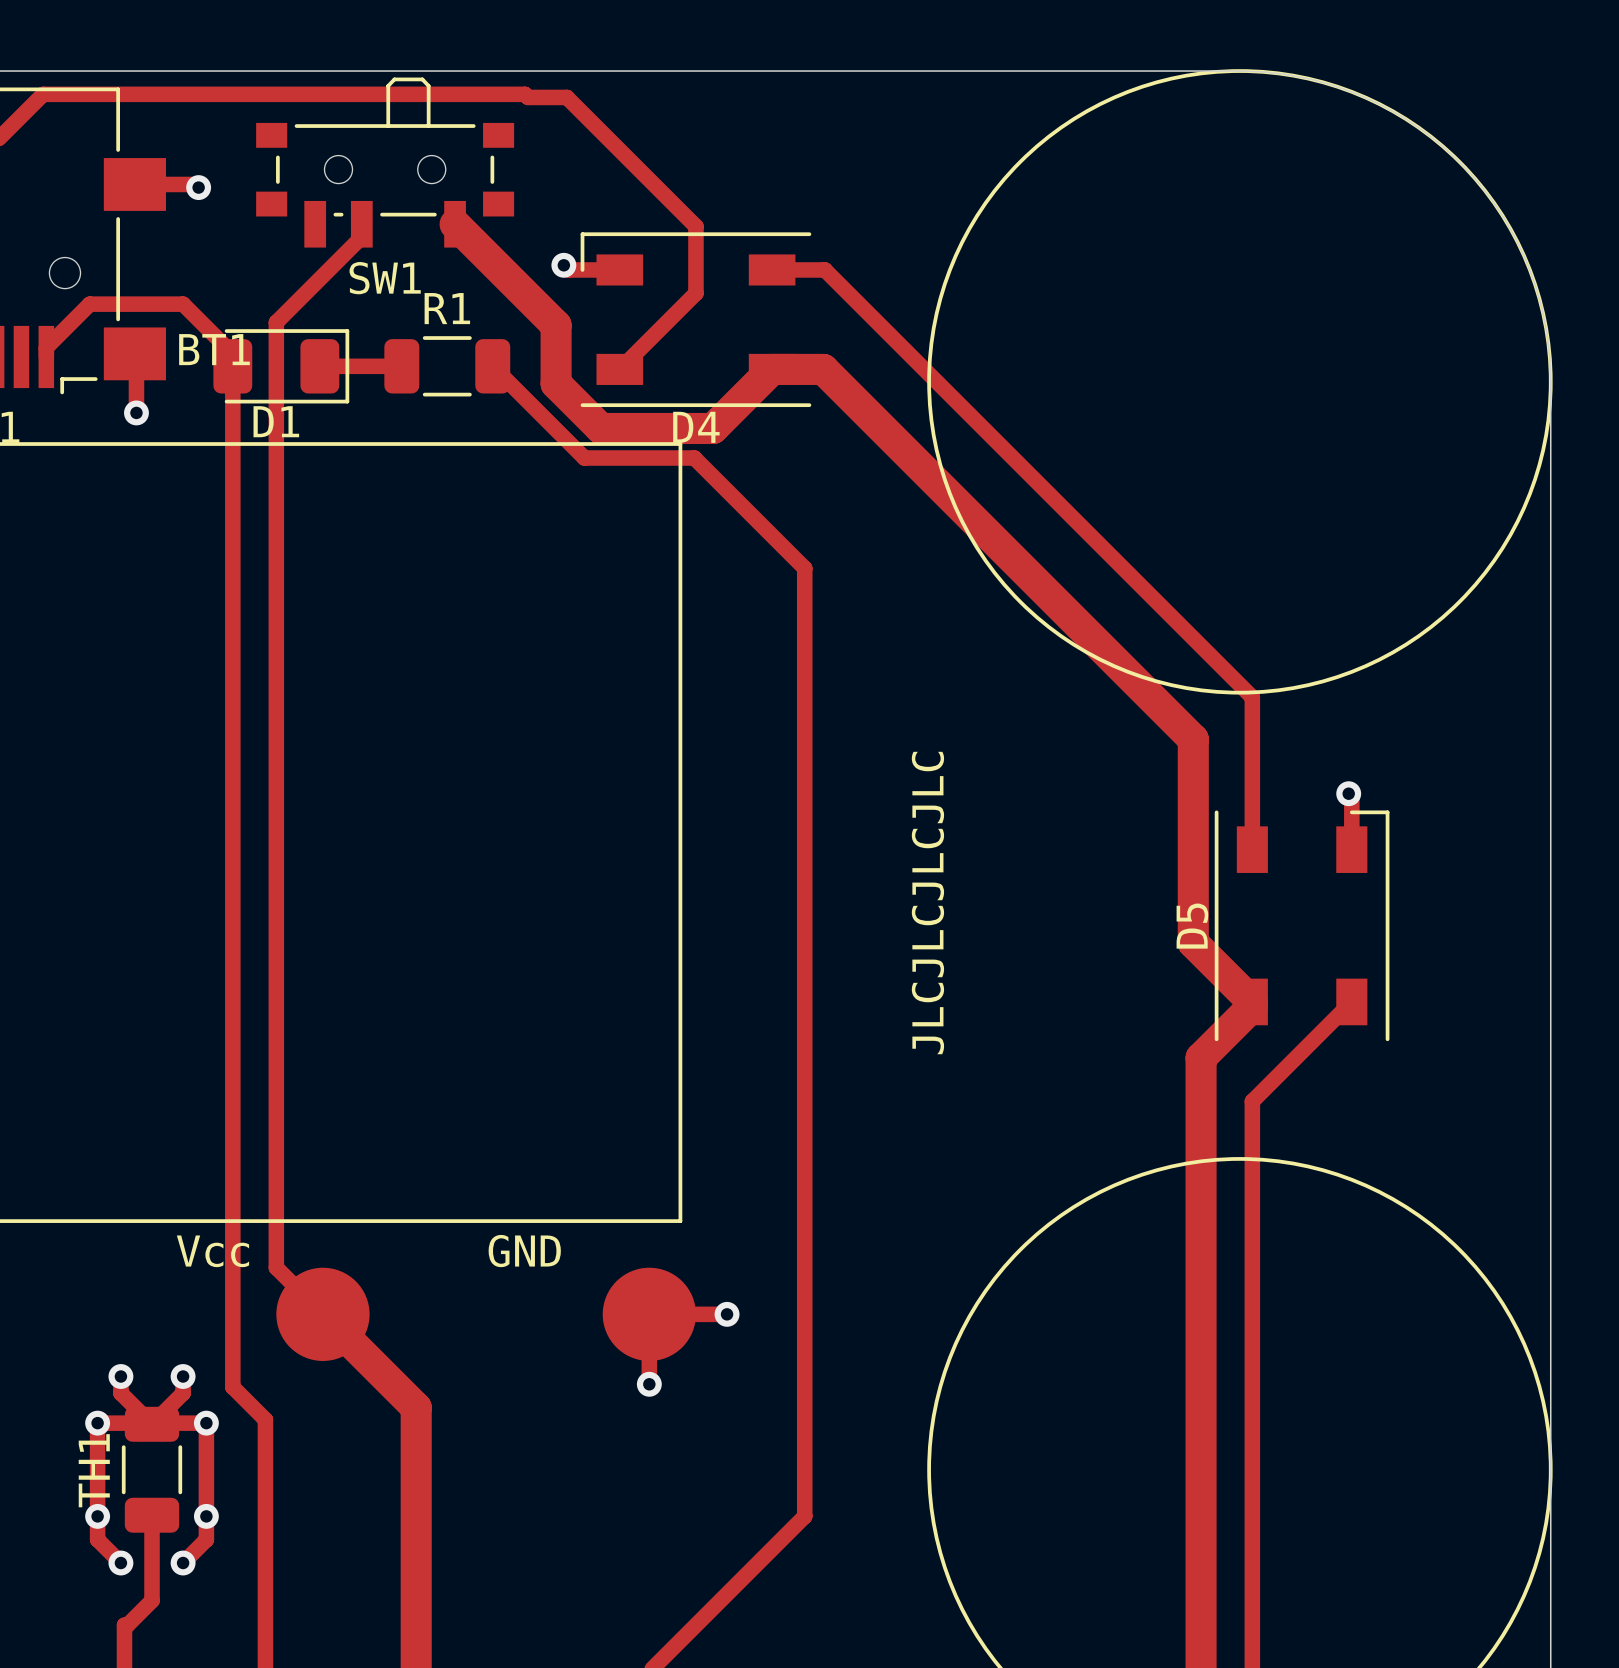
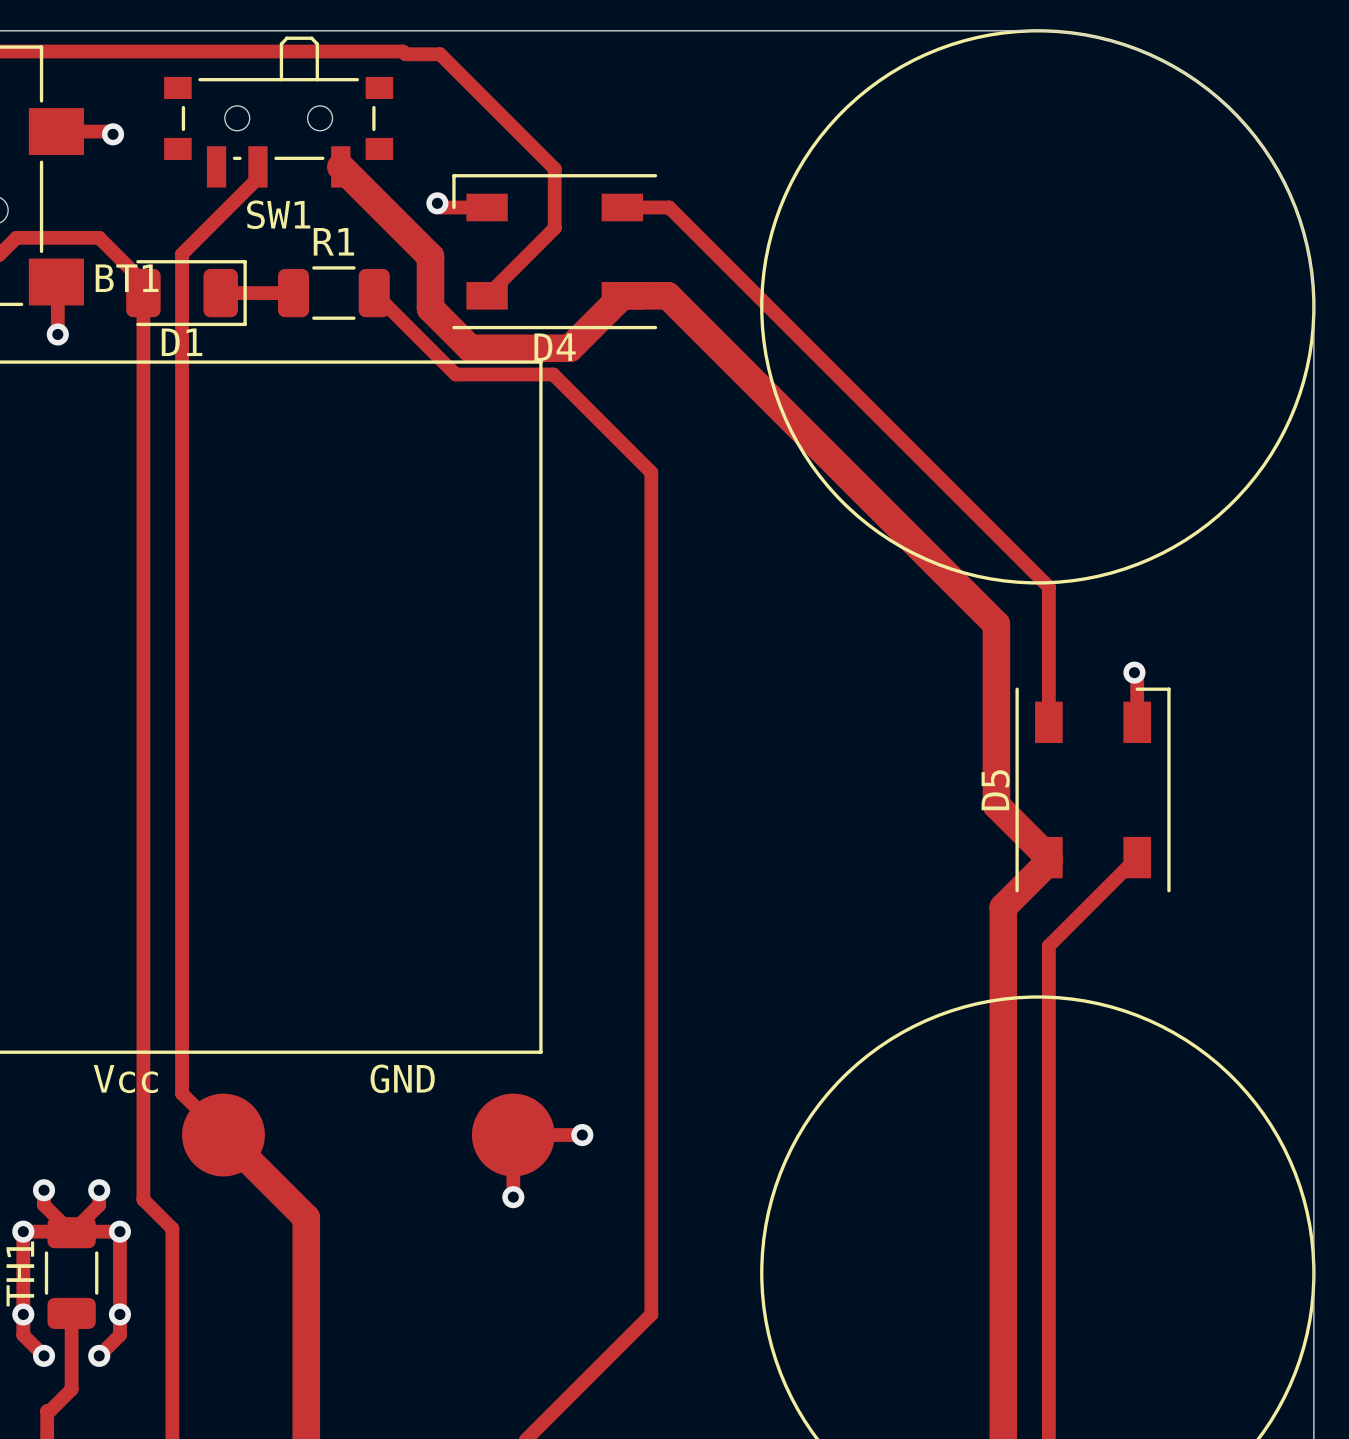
text: JLCJLCJLCJLC (927, 903) -> none

